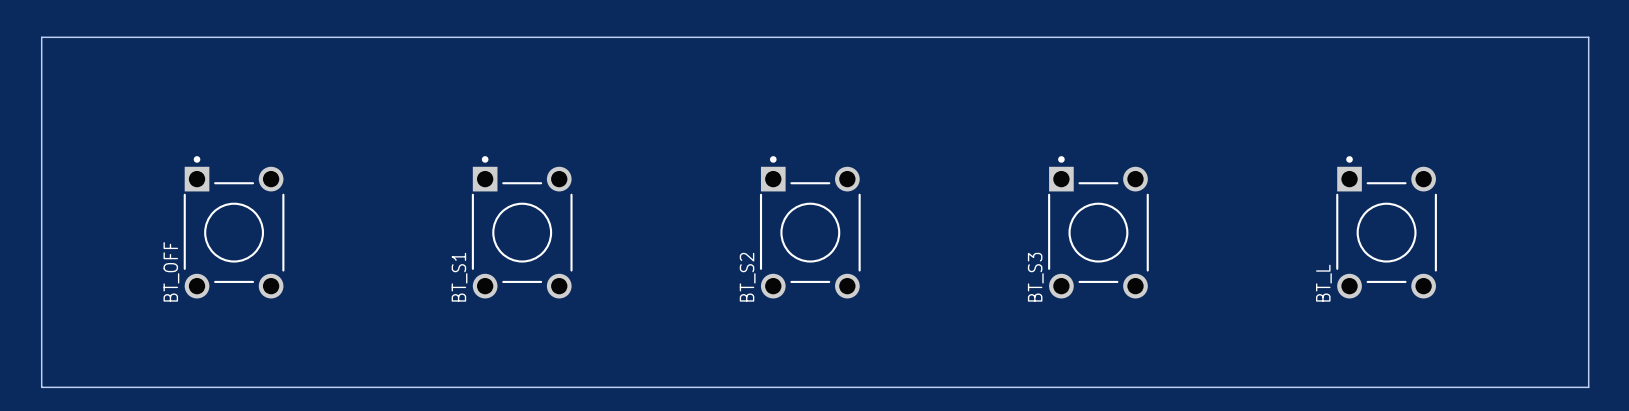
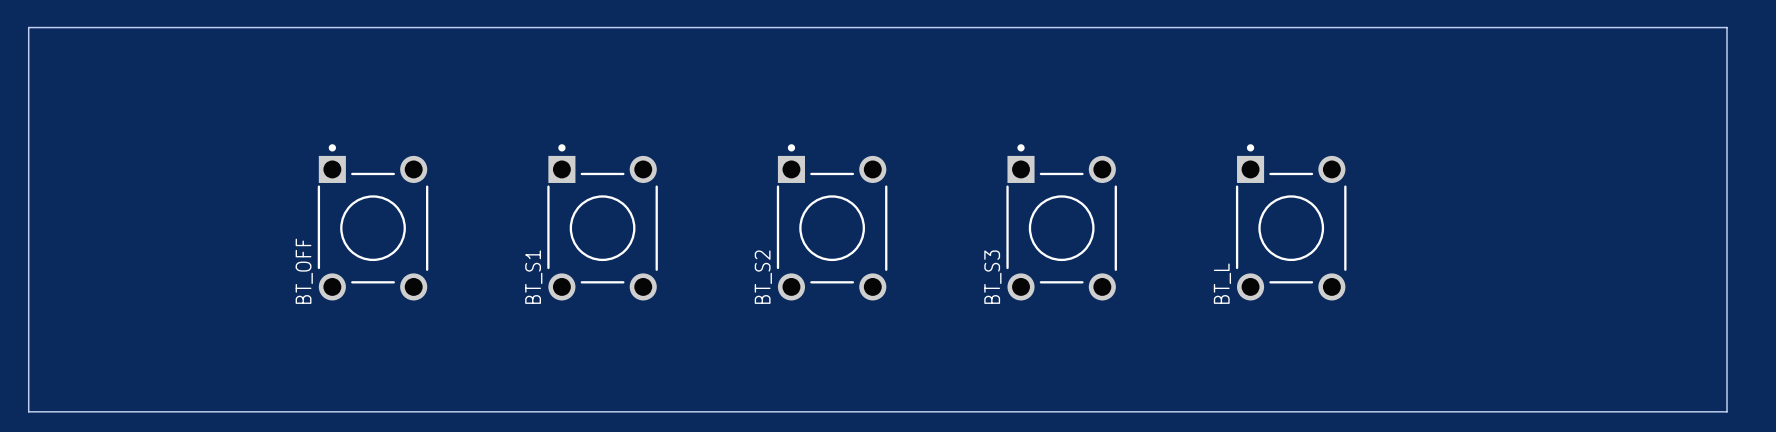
BT_OFF position: (234, 227) -> (373, 222)
BT_S1 position: (522, 227) -> (602, 222)
BT_S2 position: (810, 227) -> (832, 222)
BT_S3 position: (1098, 227) -> (1061, 222)
BT_L position: (1386, 227) -> (1291, 222)

